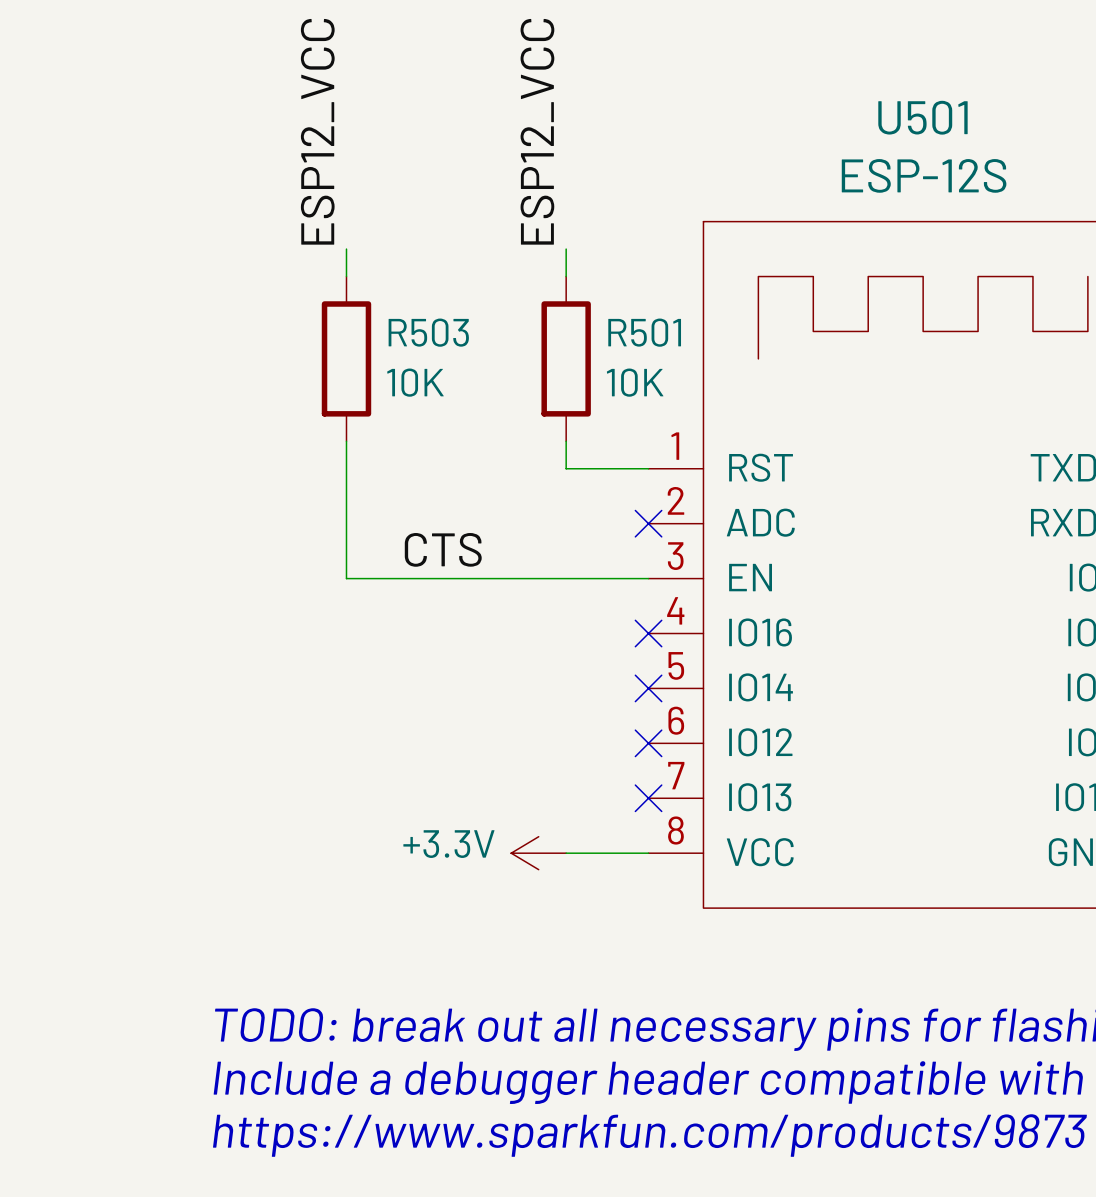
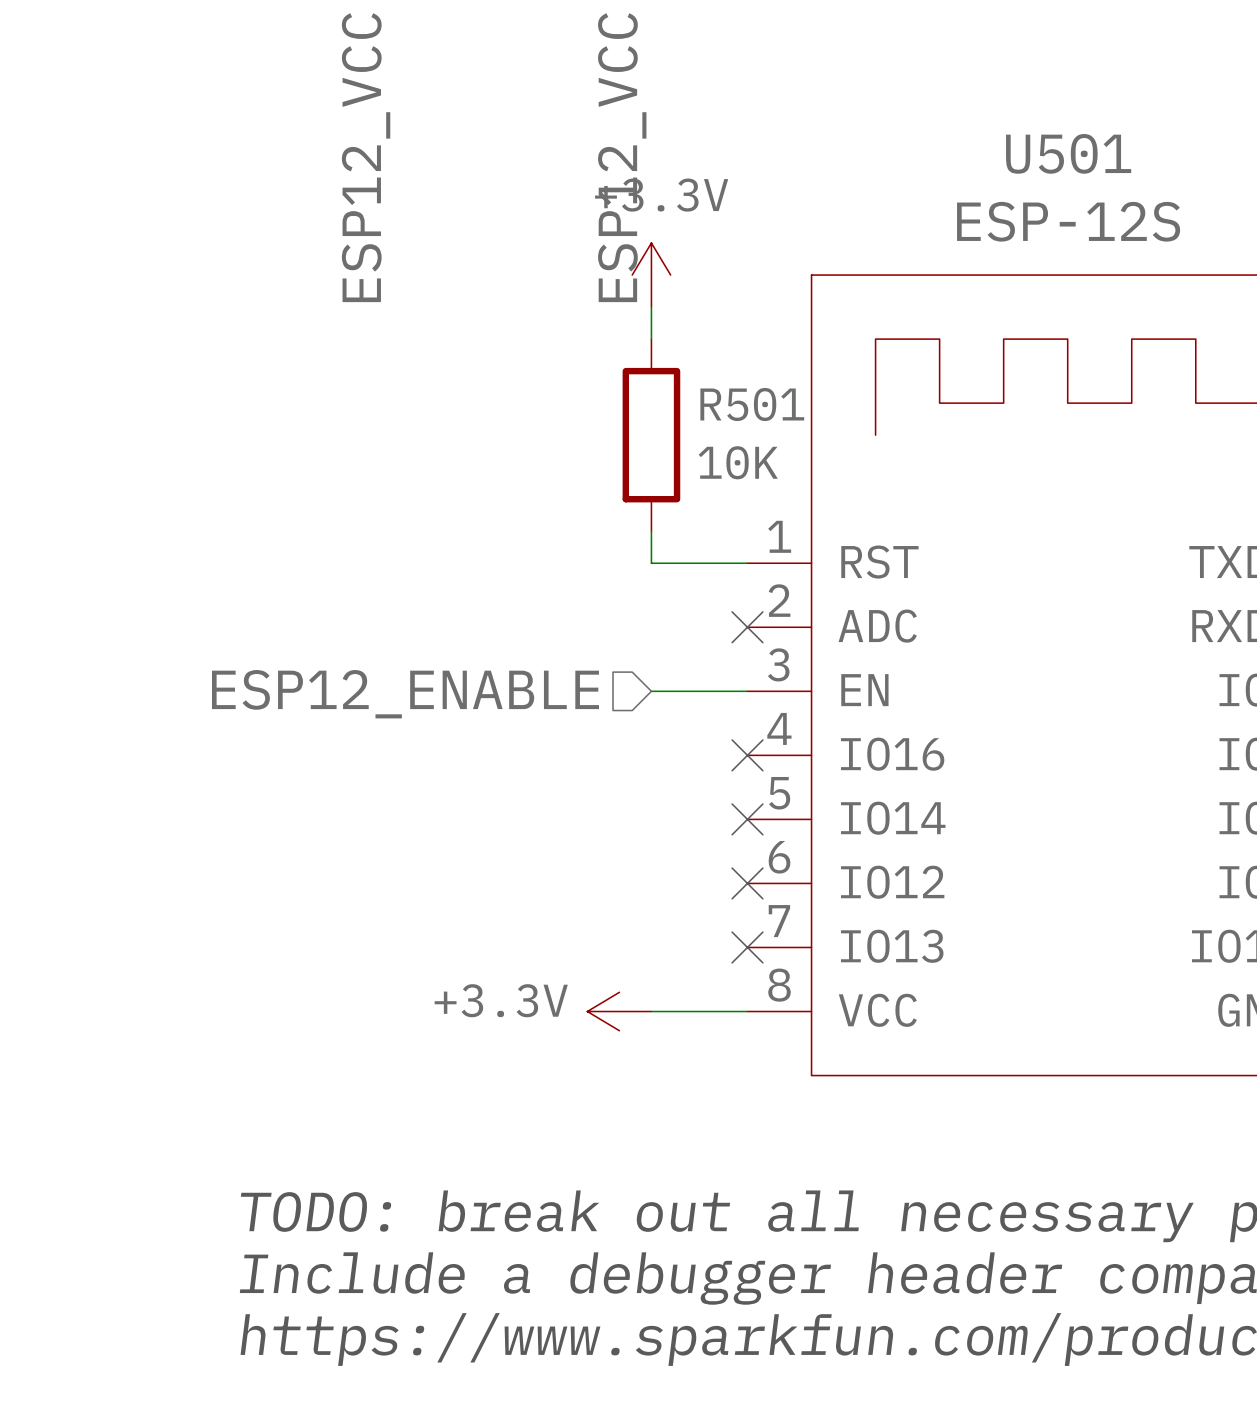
power symbol: none -> +3.3V (651, 275)
wire: (346, 249) (346, 276) -> none
R503: 10K (346, 358) -> none
wire: (346, 441) (346, 578) (566, 578) -> none
label: CTS (443, 549) -> none
hierarchical label: none -> ESP12_ENABLE (405, 694)

